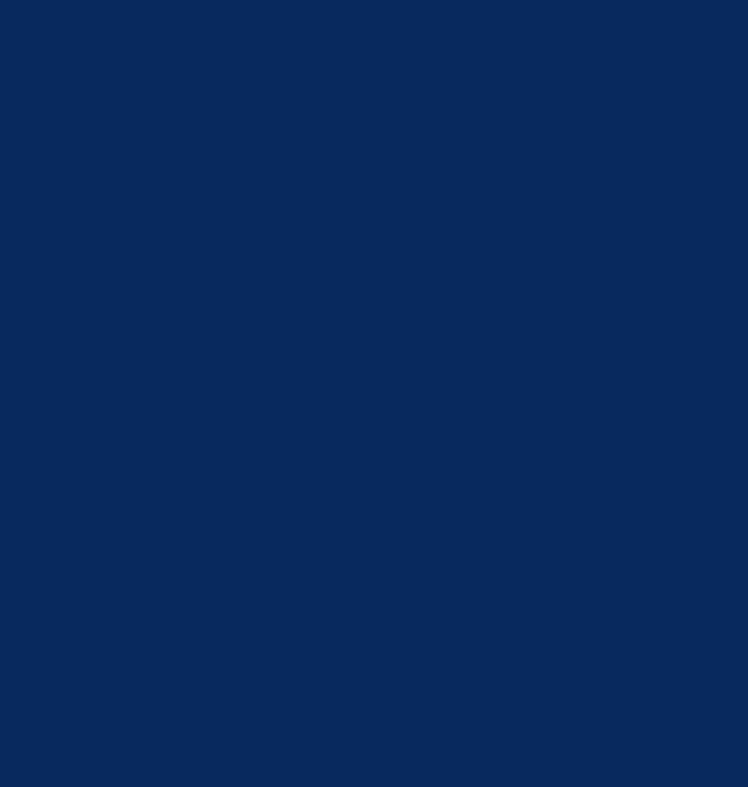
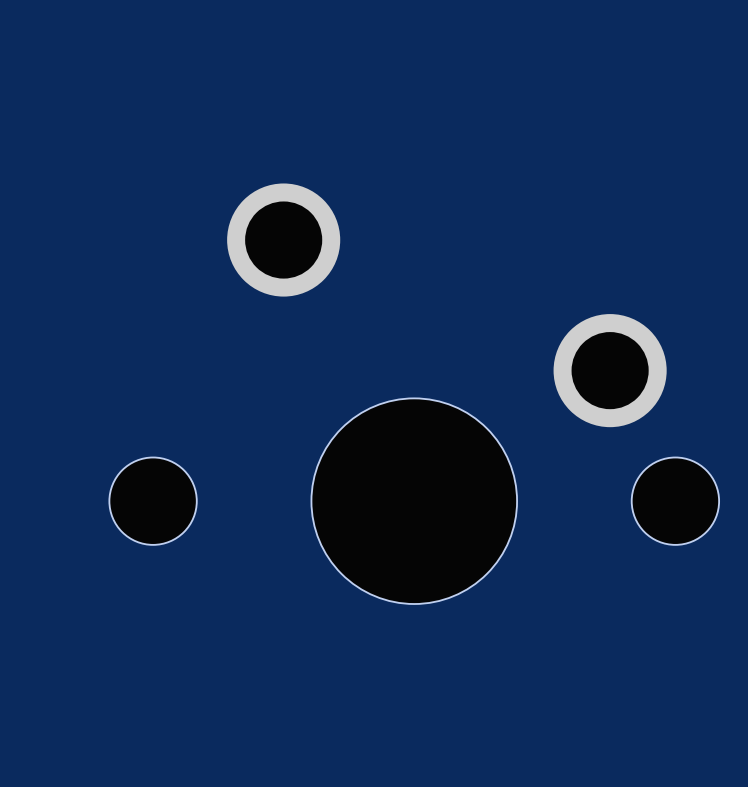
part: none -> (414, 393)

